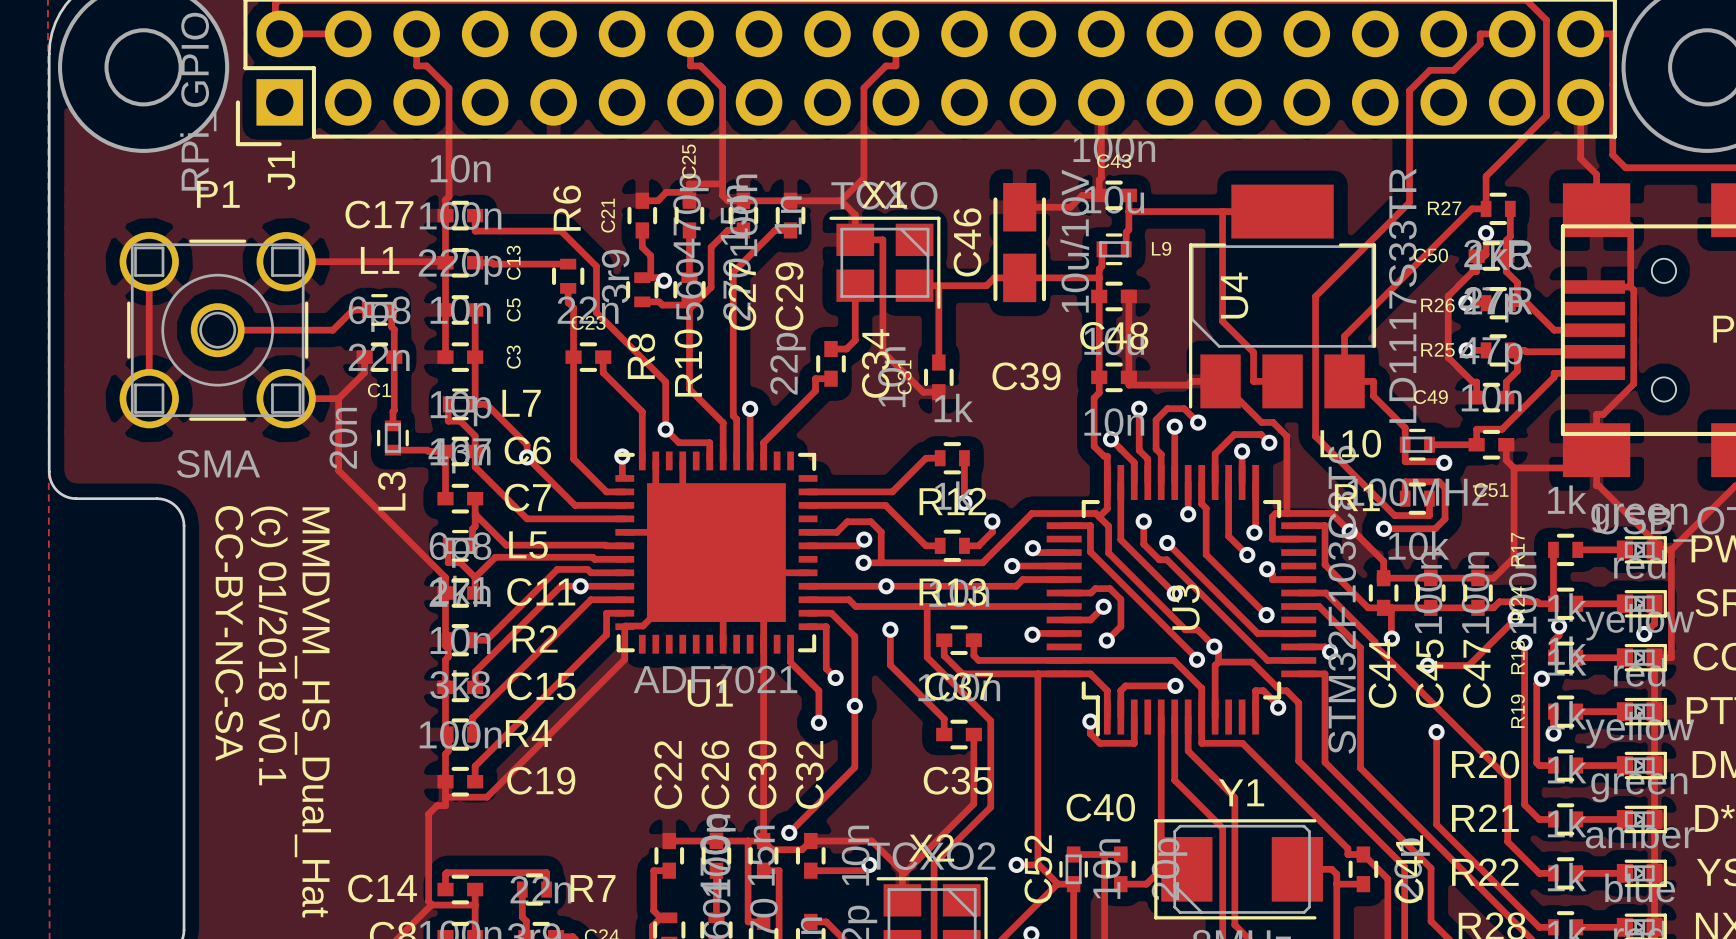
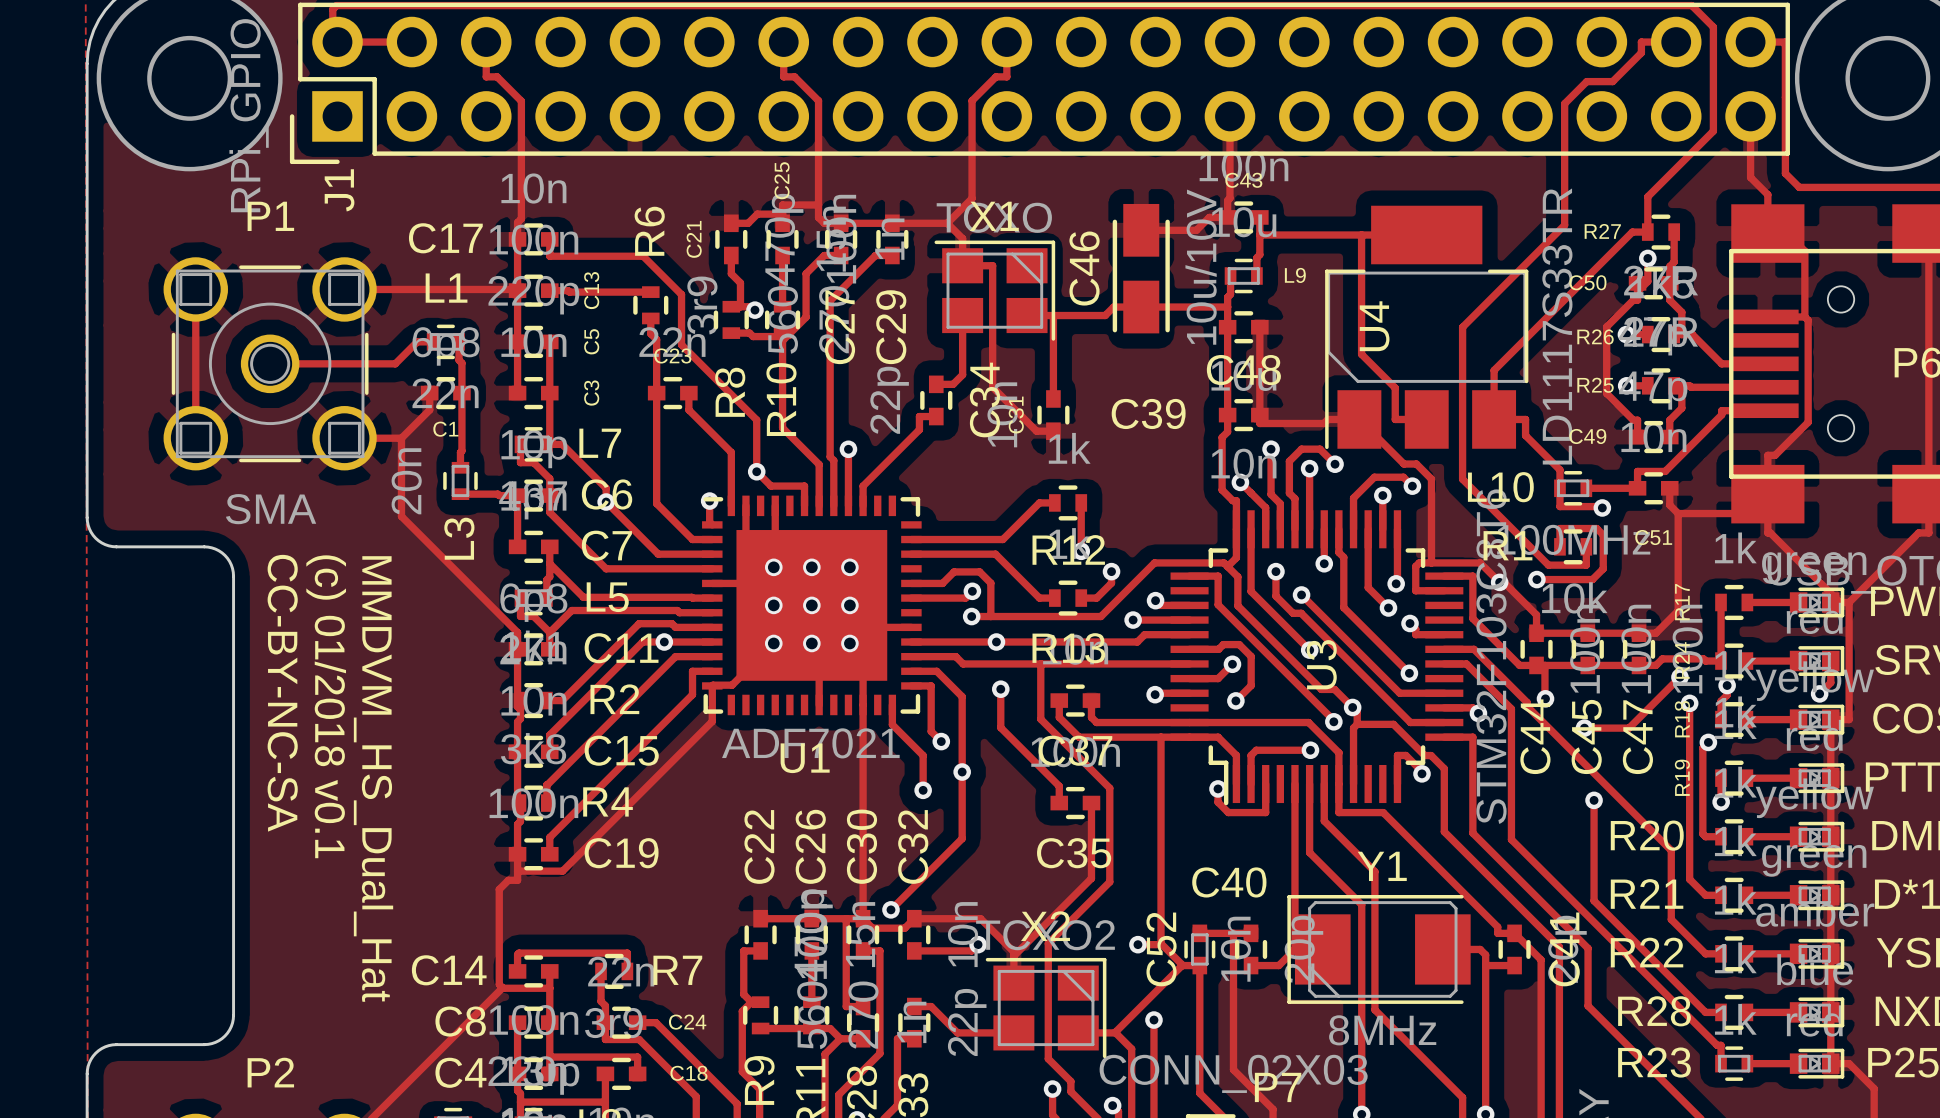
via: none -> (773, 567)
via: none -> (811, 567)
via: none -> (849, 567)
via: none -> (773, 605)
via: none -> (811, 605)
via: none -> (849, 605)
via: none -> (773, 643)
via: none -> (811, 643)
via: none -> (849, 643)

